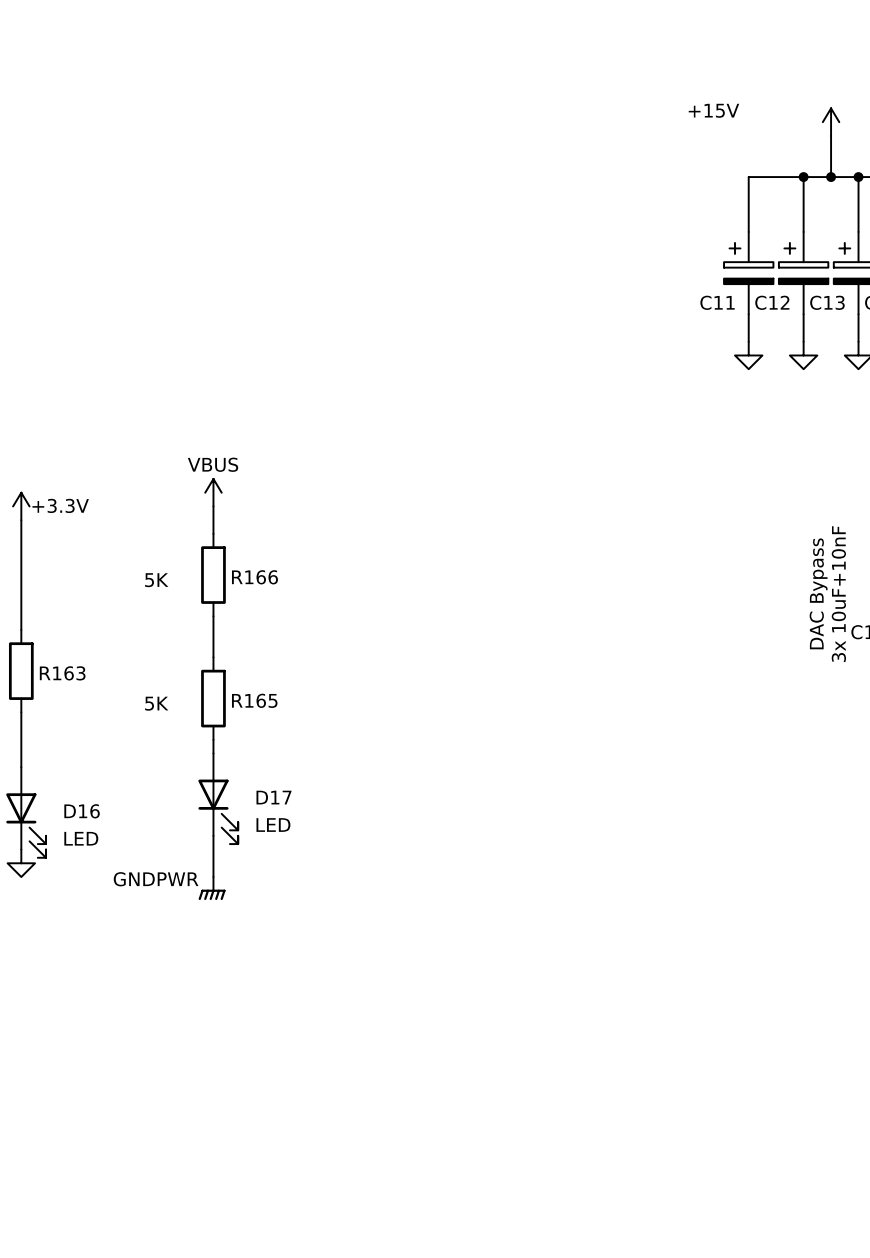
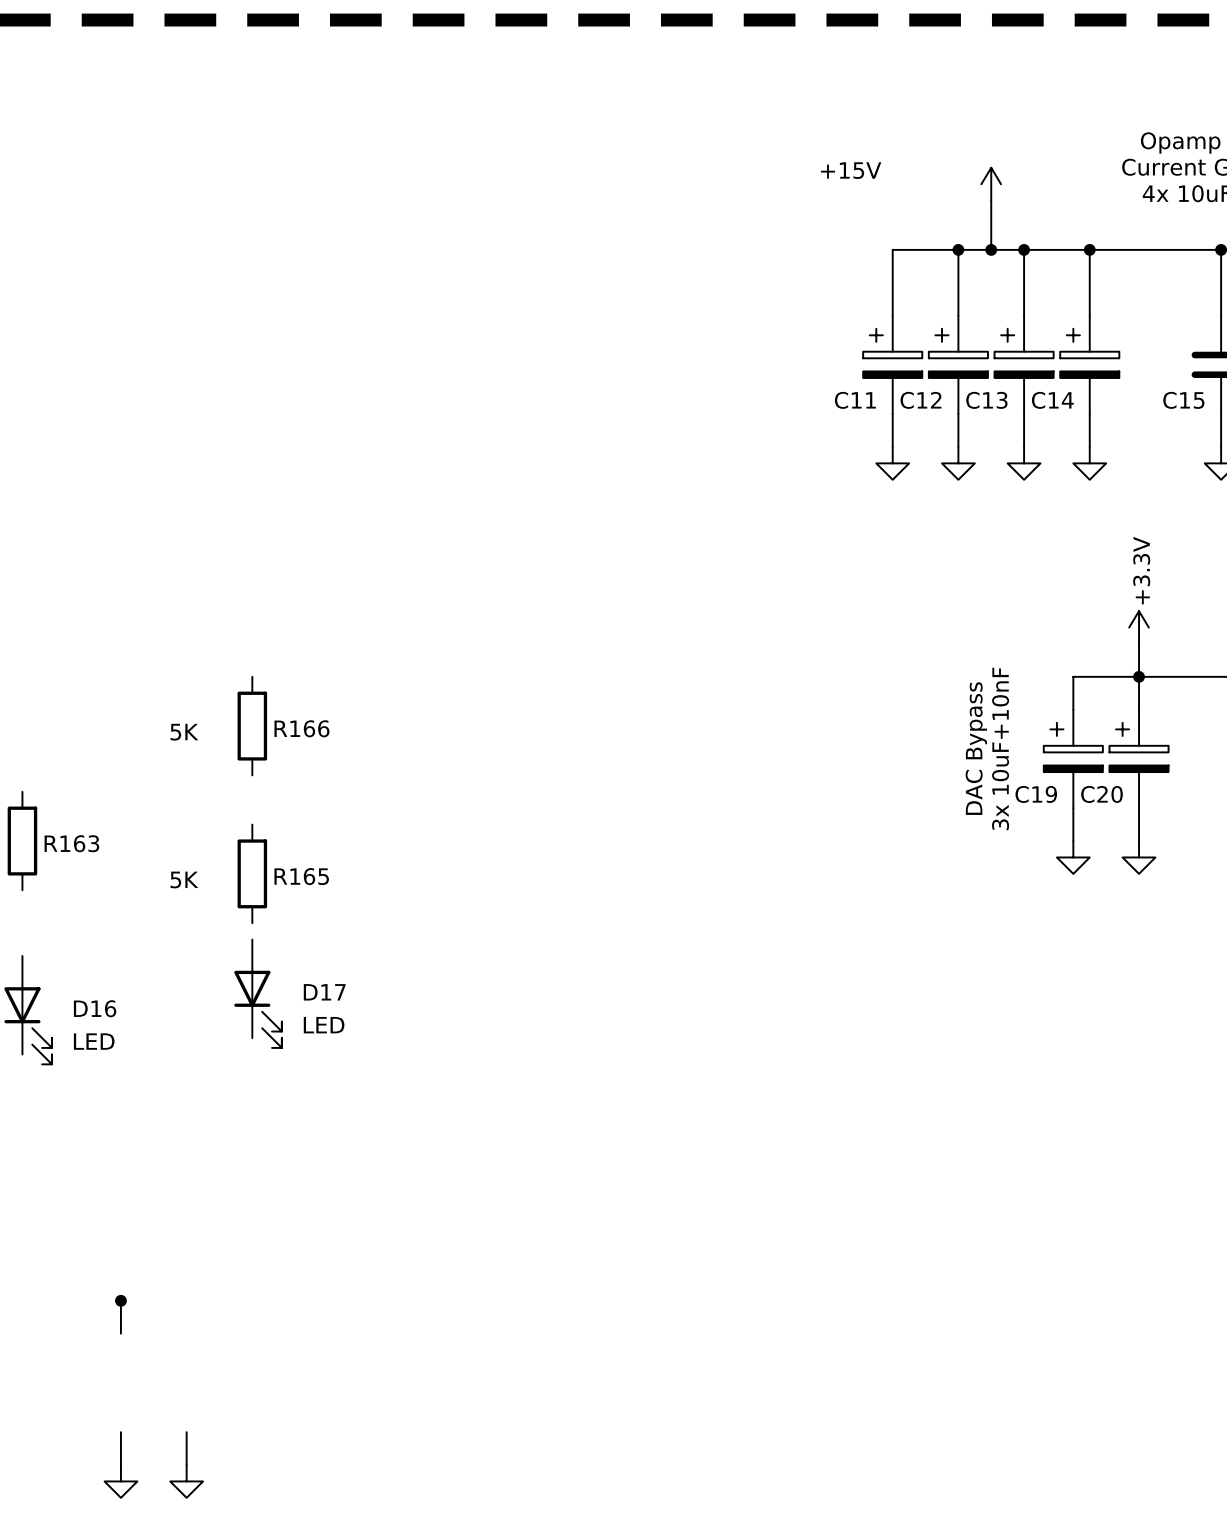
power symbol: VBUS (213, 492) -> none
power symbol: +3.3V (21, 506) -> none
wire: (213, 506) (213, 533) -> none
wire: (21, 520) (21, 629) -> none
wire: (213, 616) (213, 657) -> none
wire: (21, 712) (21, 767) -> none
wire: (213, 739) (213, 753) -> none
wire: (213, 835) (213, 877) -> none
power symbol: (21, 863) -> none
power symbol: GNDPWR (212, 888) -> none
wire: none -> (120, 1300) (120, 1333)
junction: none -> (120, 1300)
wire: none -> (120, 1432) (120, 1465)
wire: none -> (186, 1432) (186, 1465)
power symbol: none -> (120, 1481)
power symbol: none -> (186, 1481)

